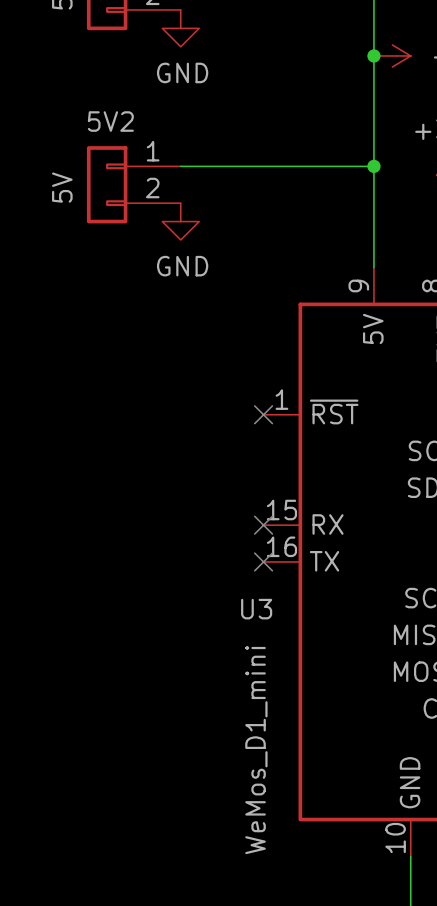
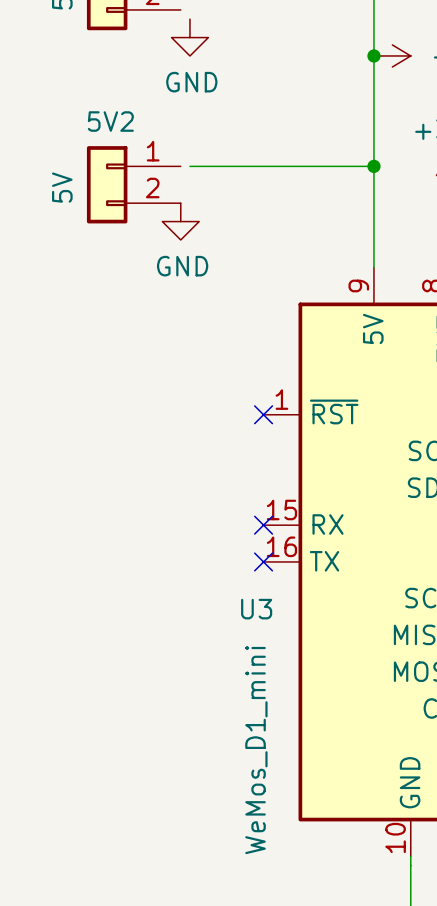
power symbol position: GND (180, 28) -> GND (189, 37)
wire: (180, 166) (189, 166) -> none

